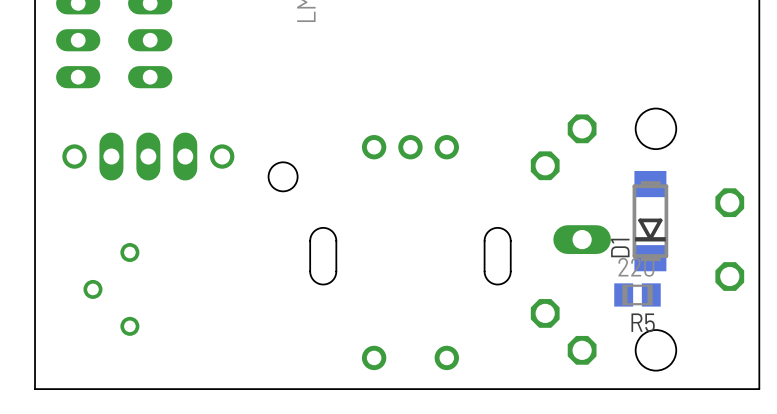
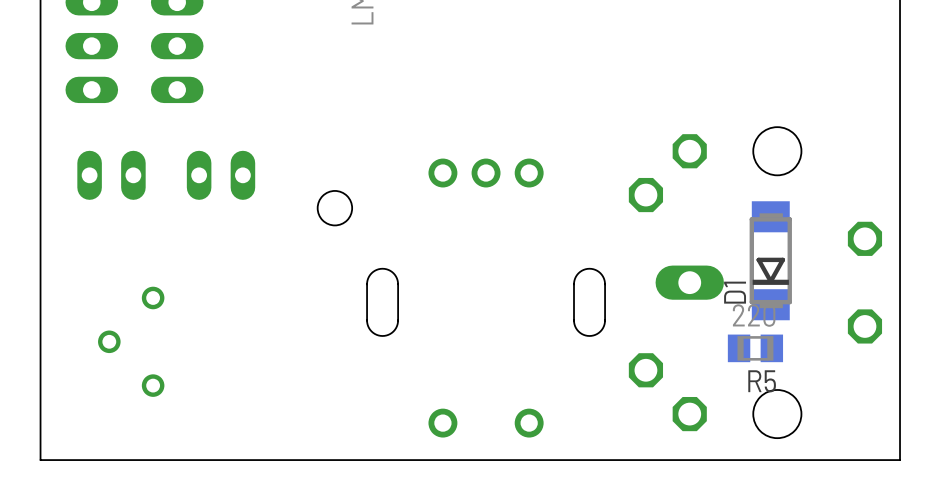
part: none -> (111, 175)
part: none -> (221, 175)
part: (148, 156) -> none

